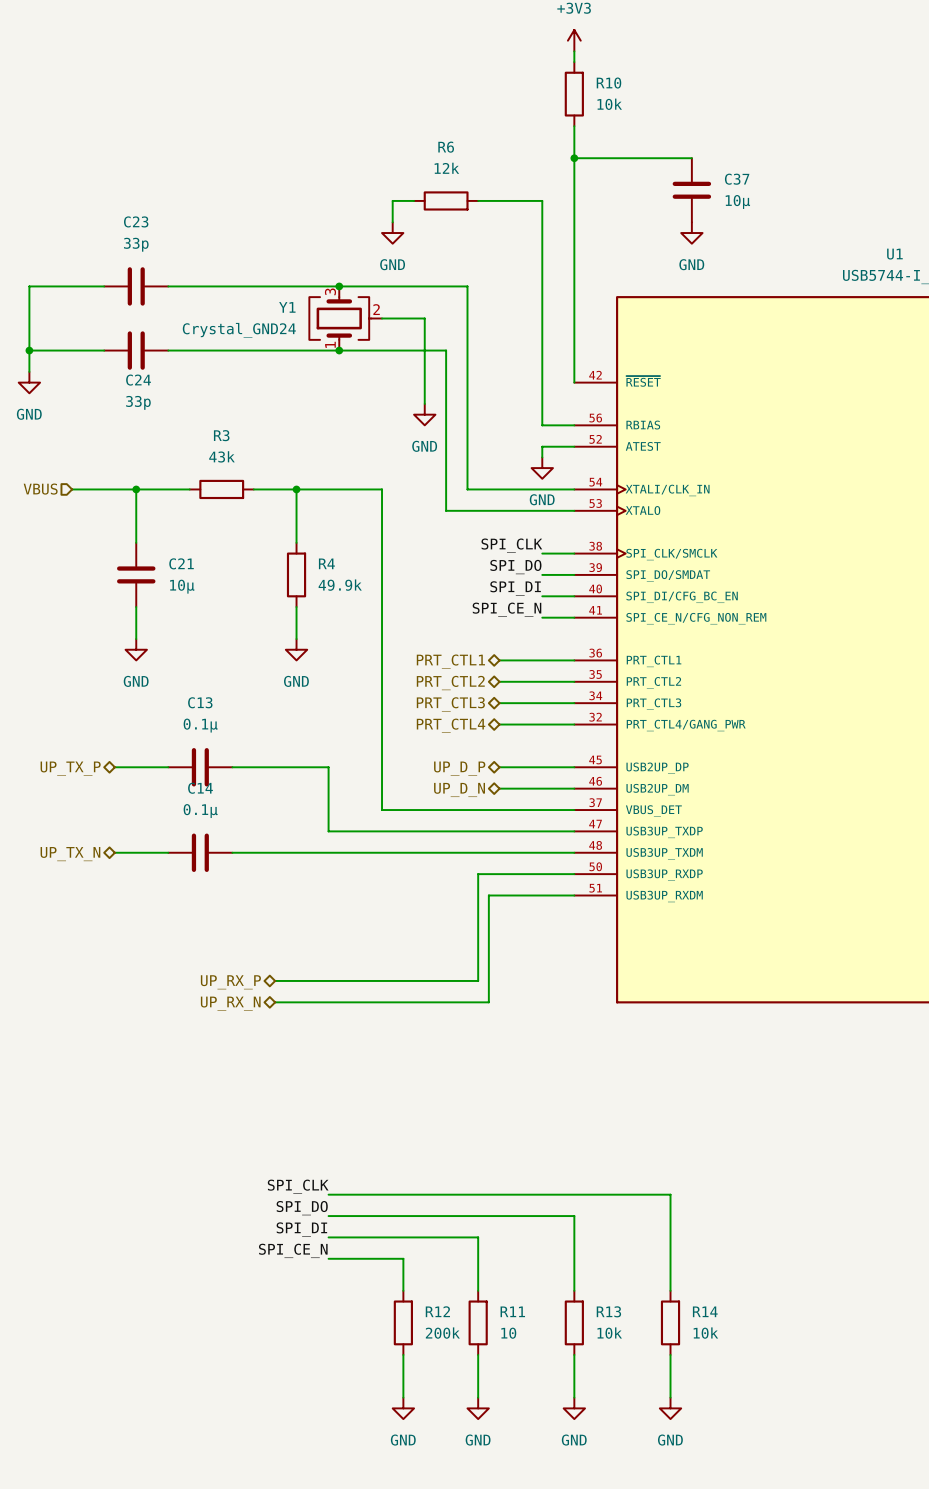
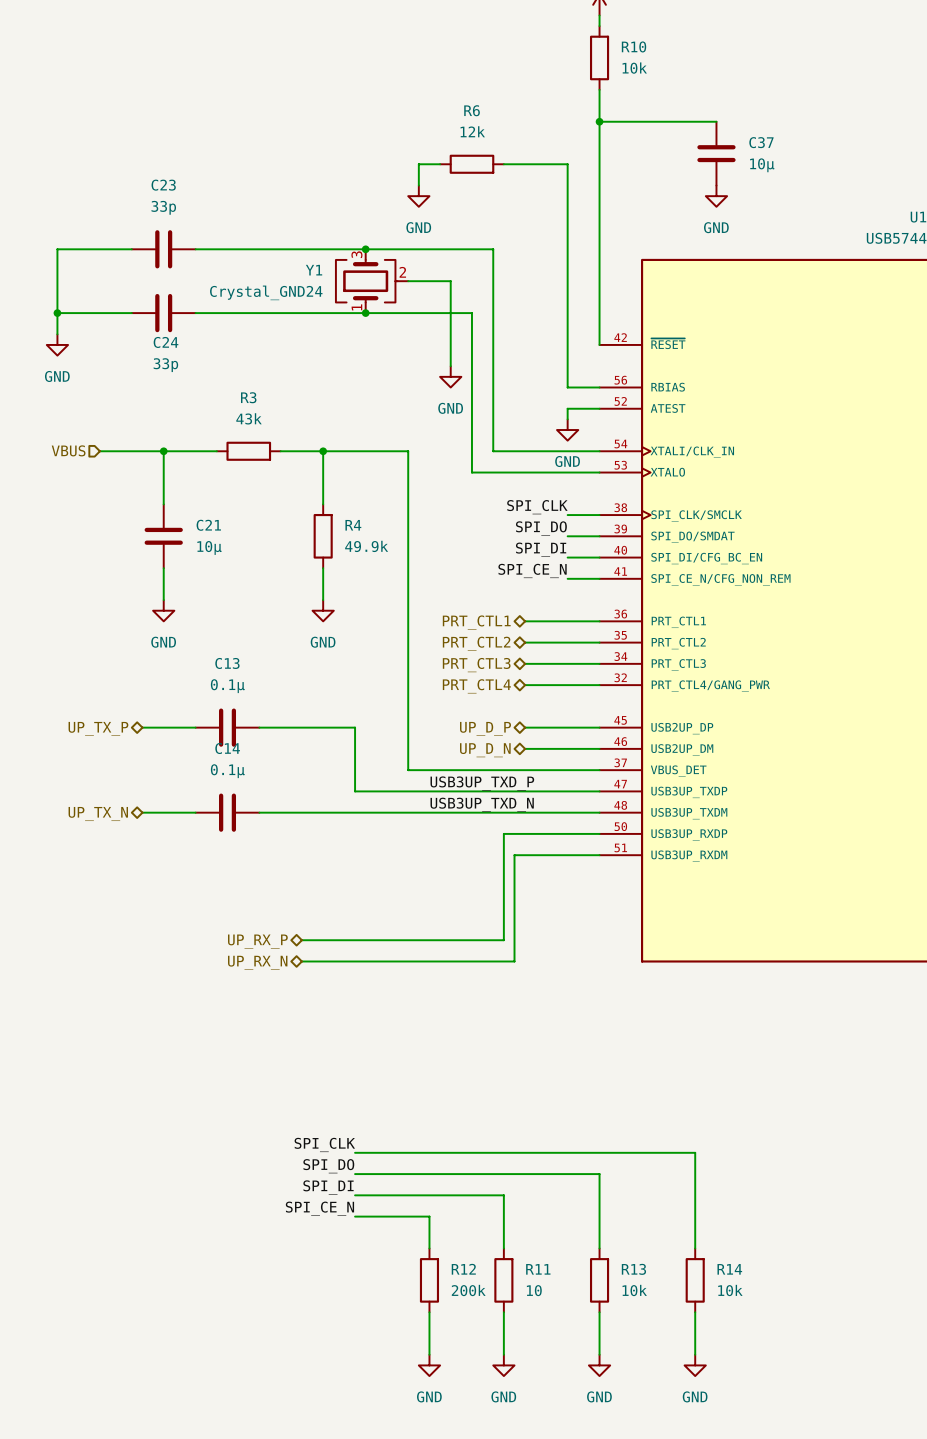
label: none -> USB3UP_TXD_P (482, 783)
label: none -> USB3UP_TXD_N (482, 804)

